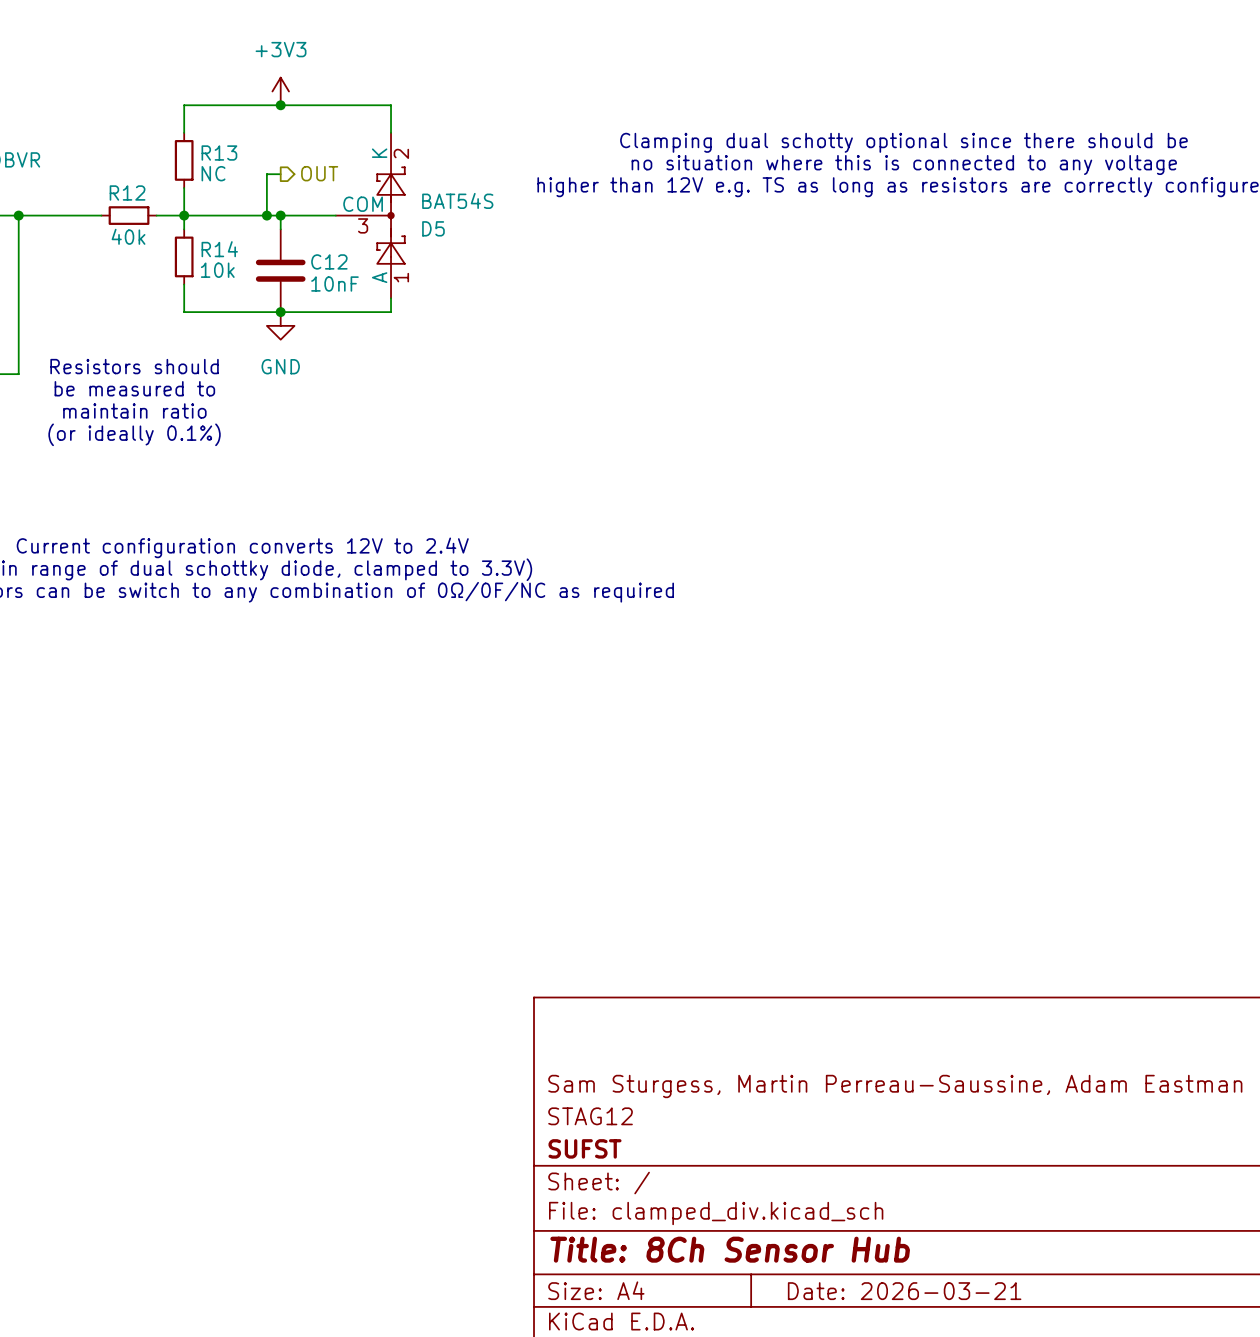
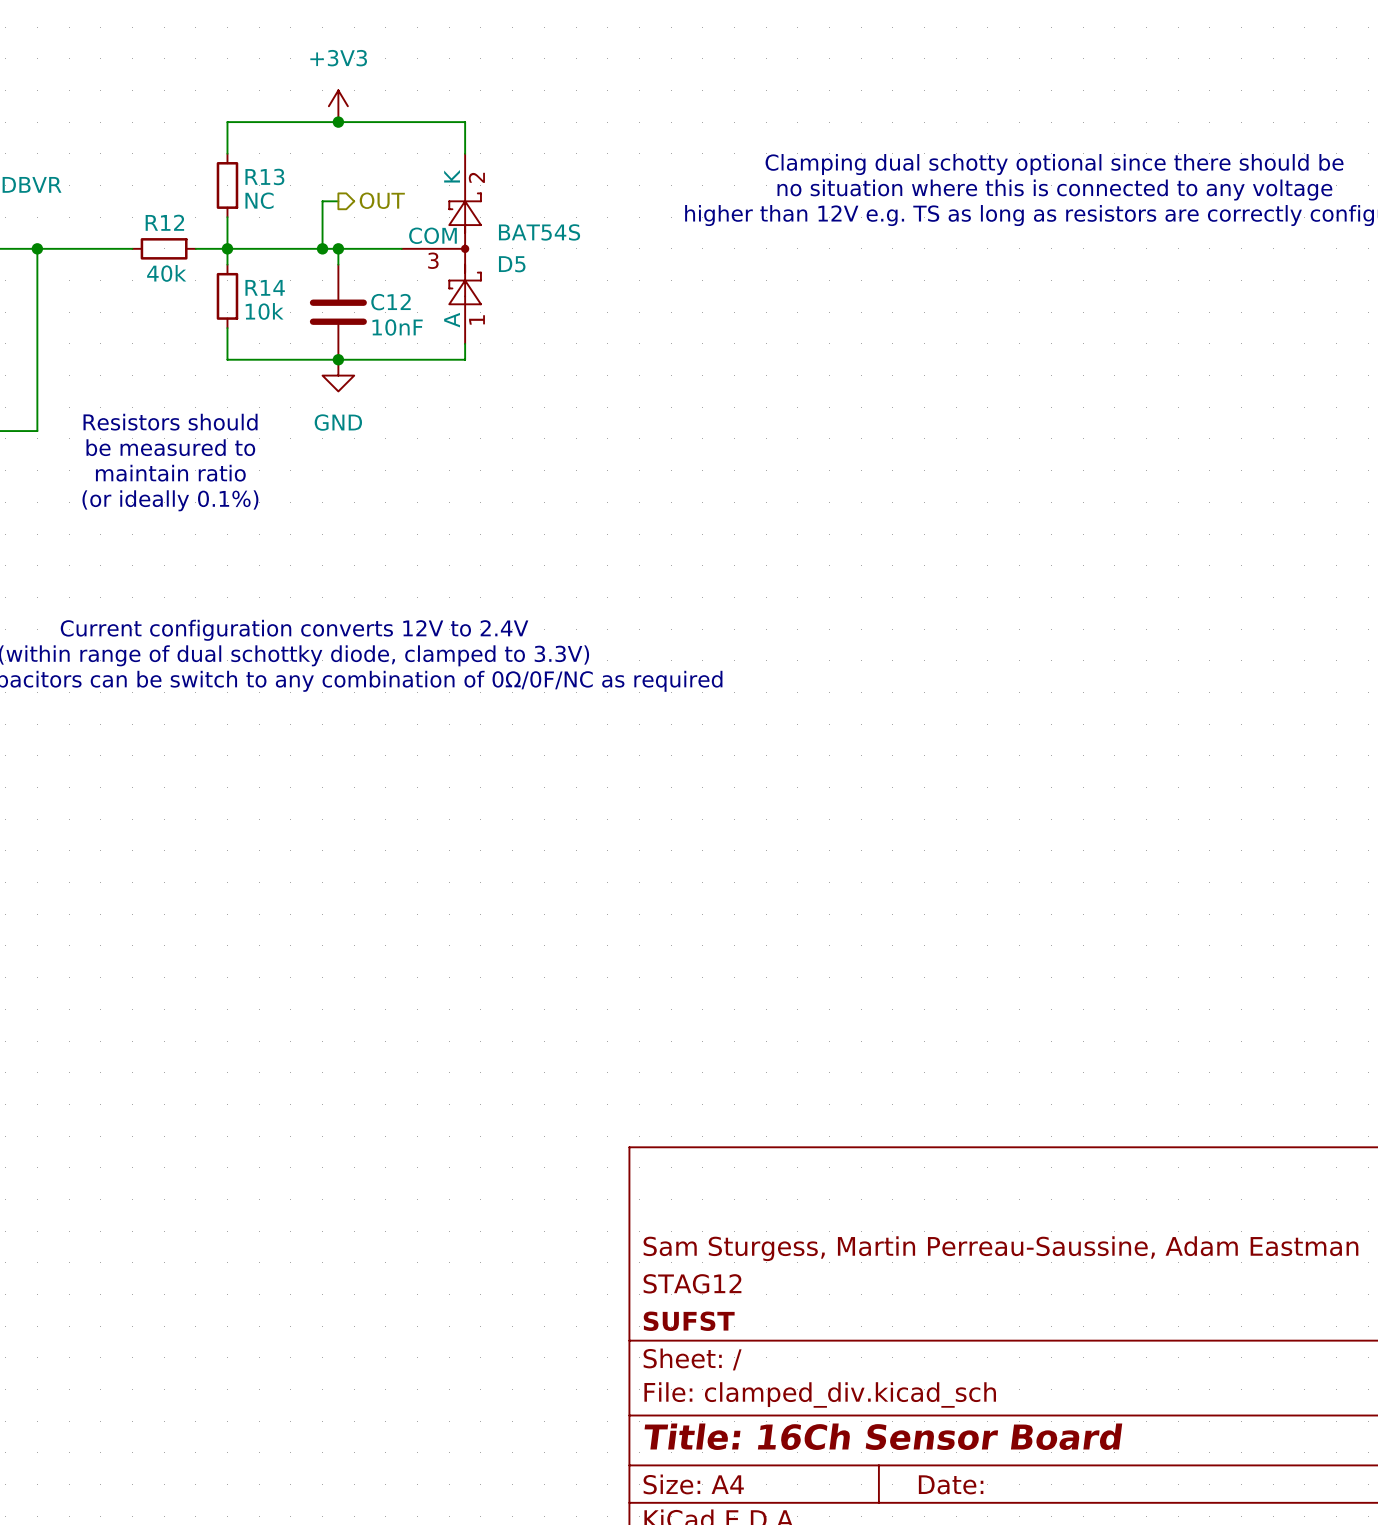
title block: Title: 8Ch Sensor Hub (730, 1249) -> Title: 16Ch Sensor Board (883, 1436)
title block: Date: 2026-03-21 (904, 1291) -> Date: (951, 1484)

